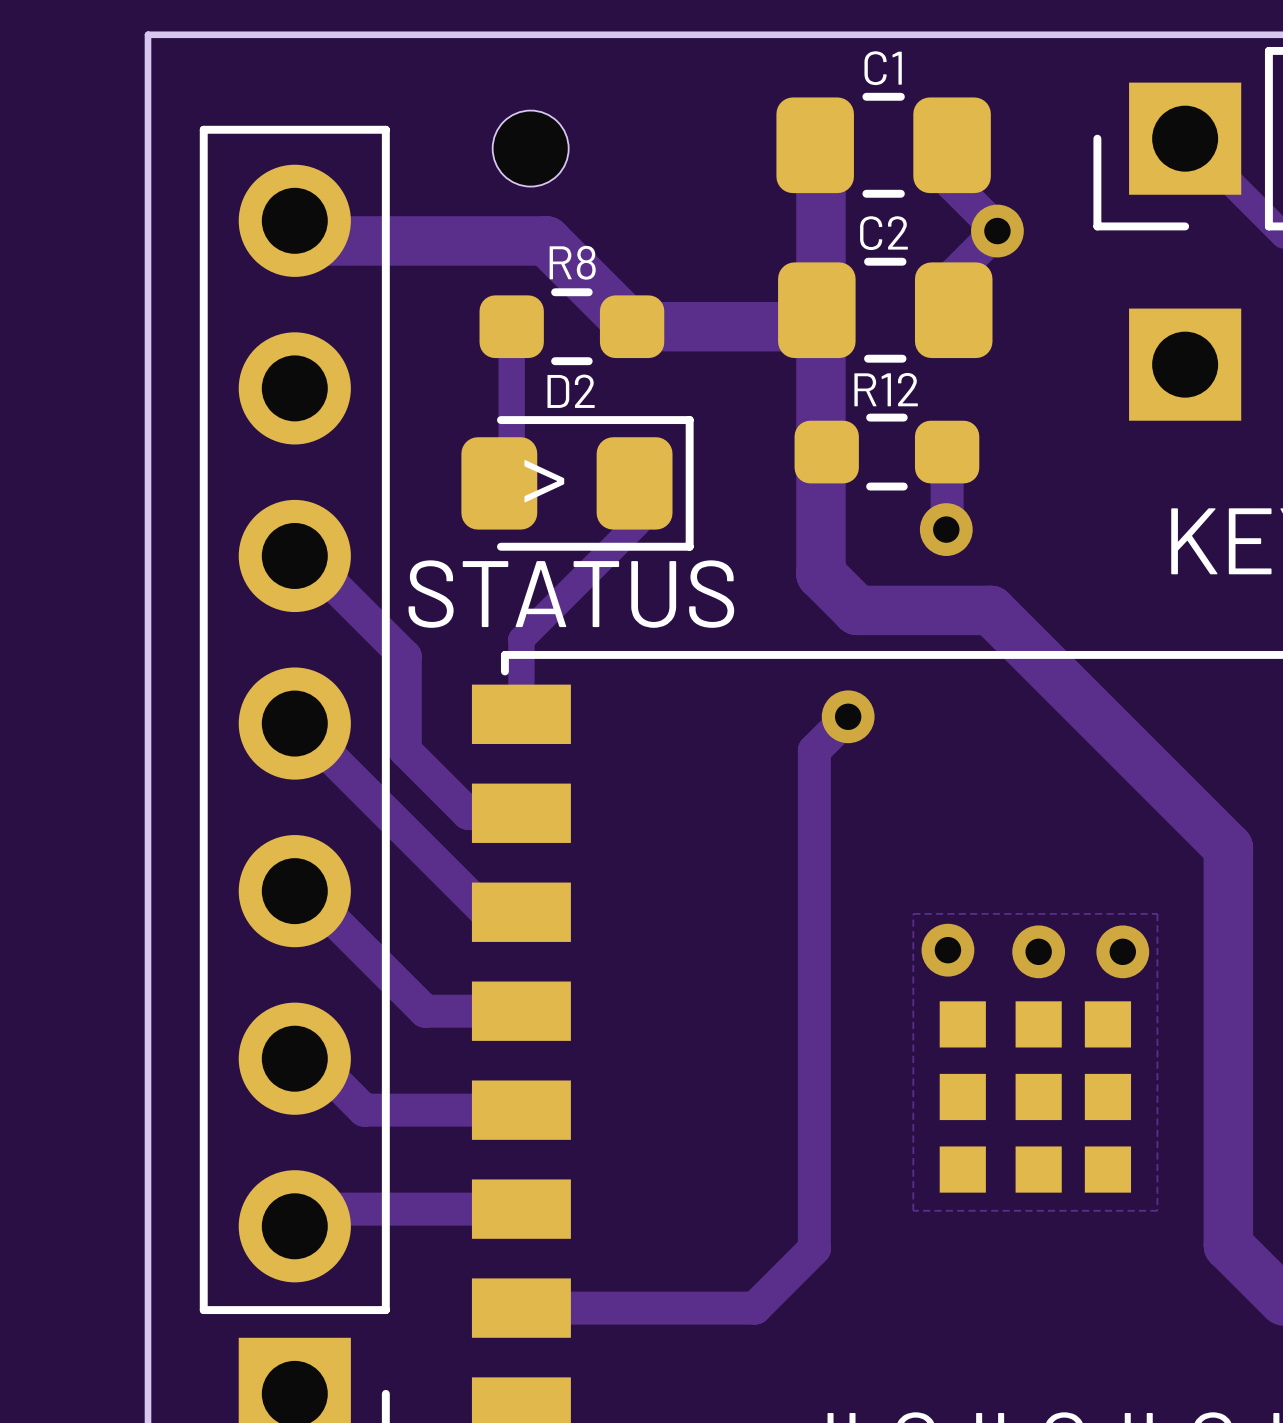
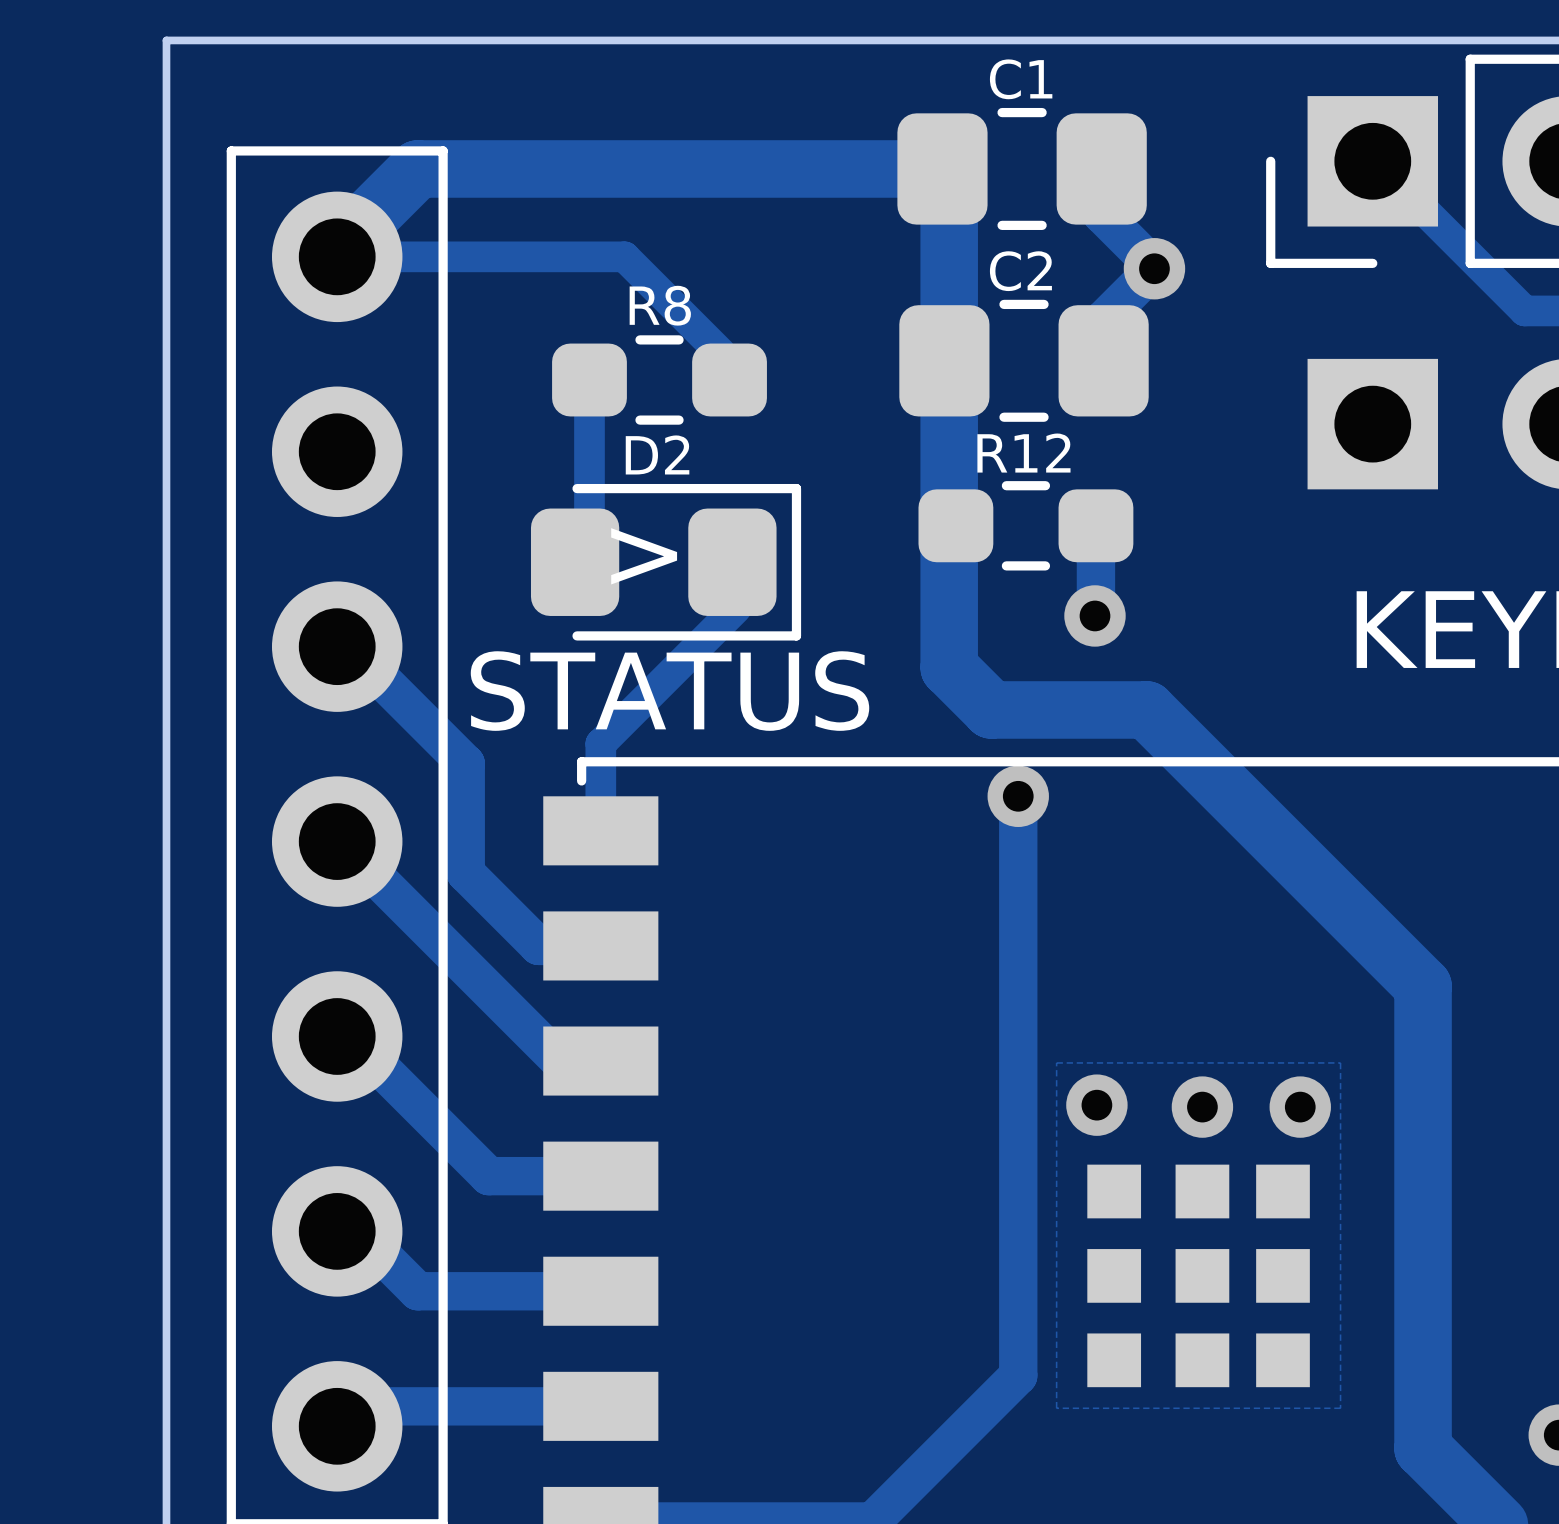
track: none -> (942, 168) (417, 168) (333, 253)
part: (530, 148) -> none
track: (294, 220) (314, 240) (546, 240) (632, 326) (800, 326) (816, 310) -> (337, 256) (624, 256) (720, 353)
track: (848, 716) (814, 750) (814, 1248) -> (1018, 796) (1018, 1375) (941, 1452)
via position: (848, 716) -> (1018, 796)

